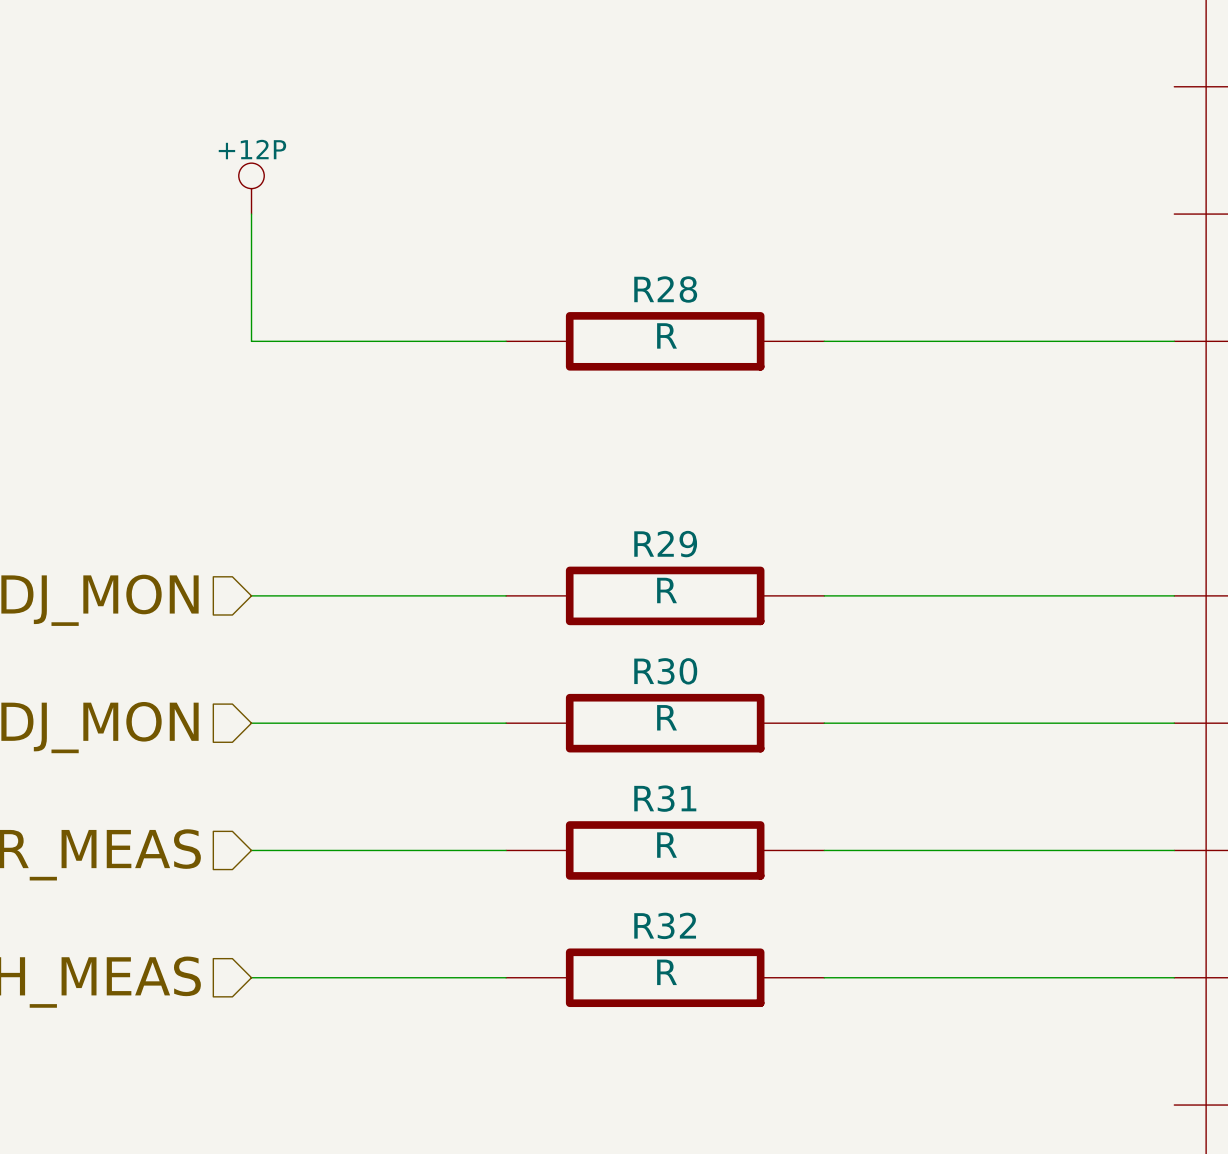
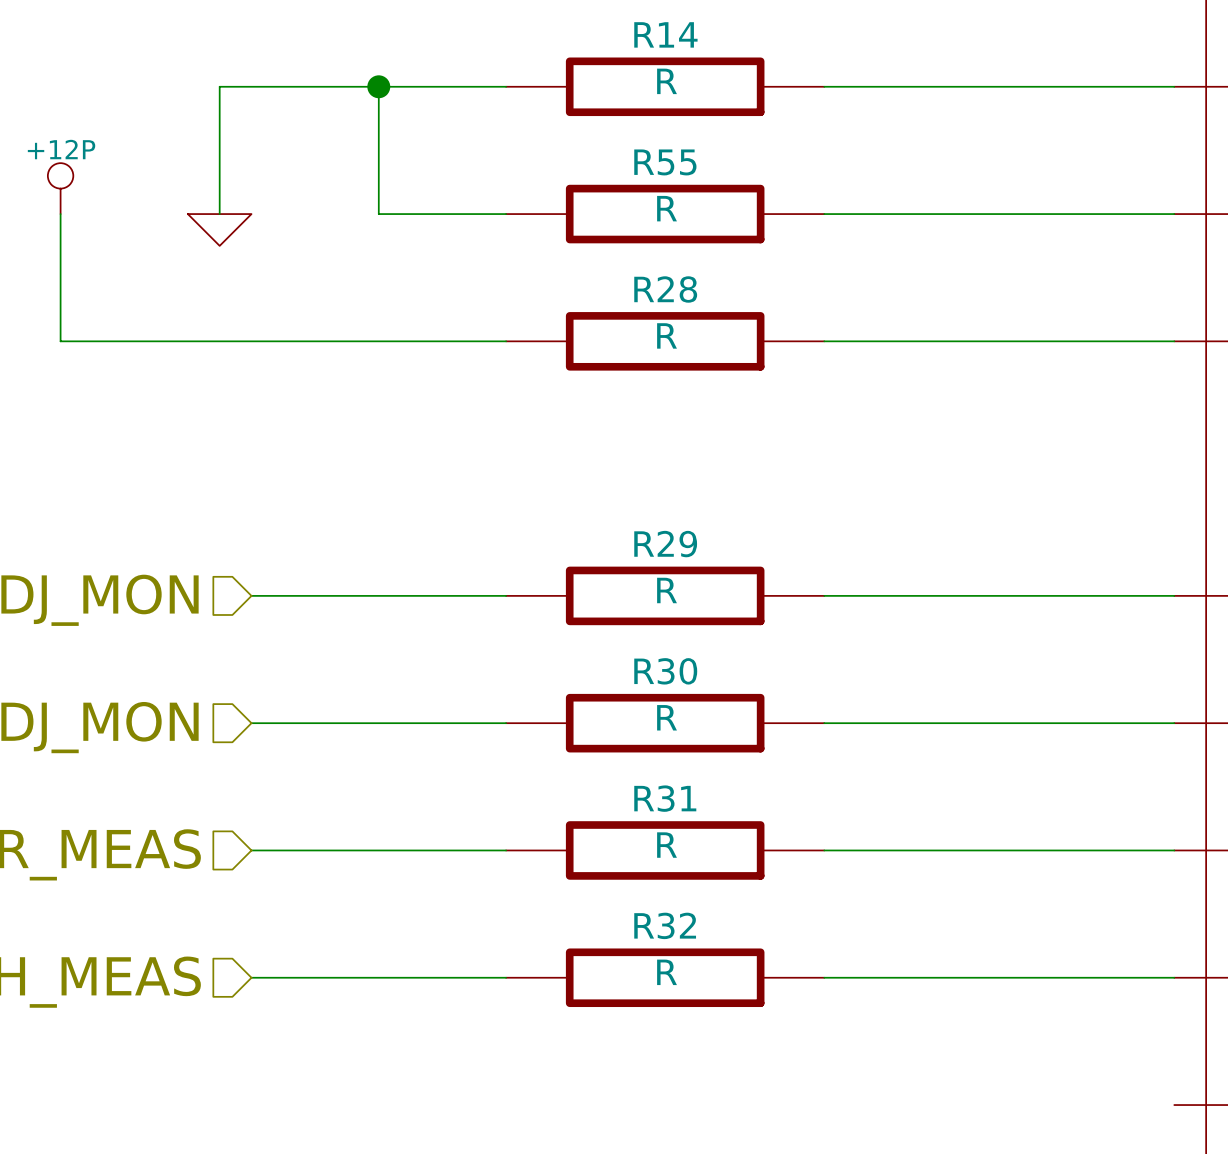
wire: none -> (378, 86) (378, 214) (506, 214)
junction: none -> (378, 86)
wire: none -> (506, 86) (219, 86) (219, 214)
R14: none -> R (665, 86)
wire: none -> (824, 86) (1174, 86)
power symbol position: +12P (251, 188) -> +12P (60, 188)
wire: (251, 214) (251, 341) -> (60, 214) (60, 341) (251, 341)
R55: none -> R (665, 214)
wire: none -> (824, 214) (1174, 214)
power symbol: none -> (219, 229)

